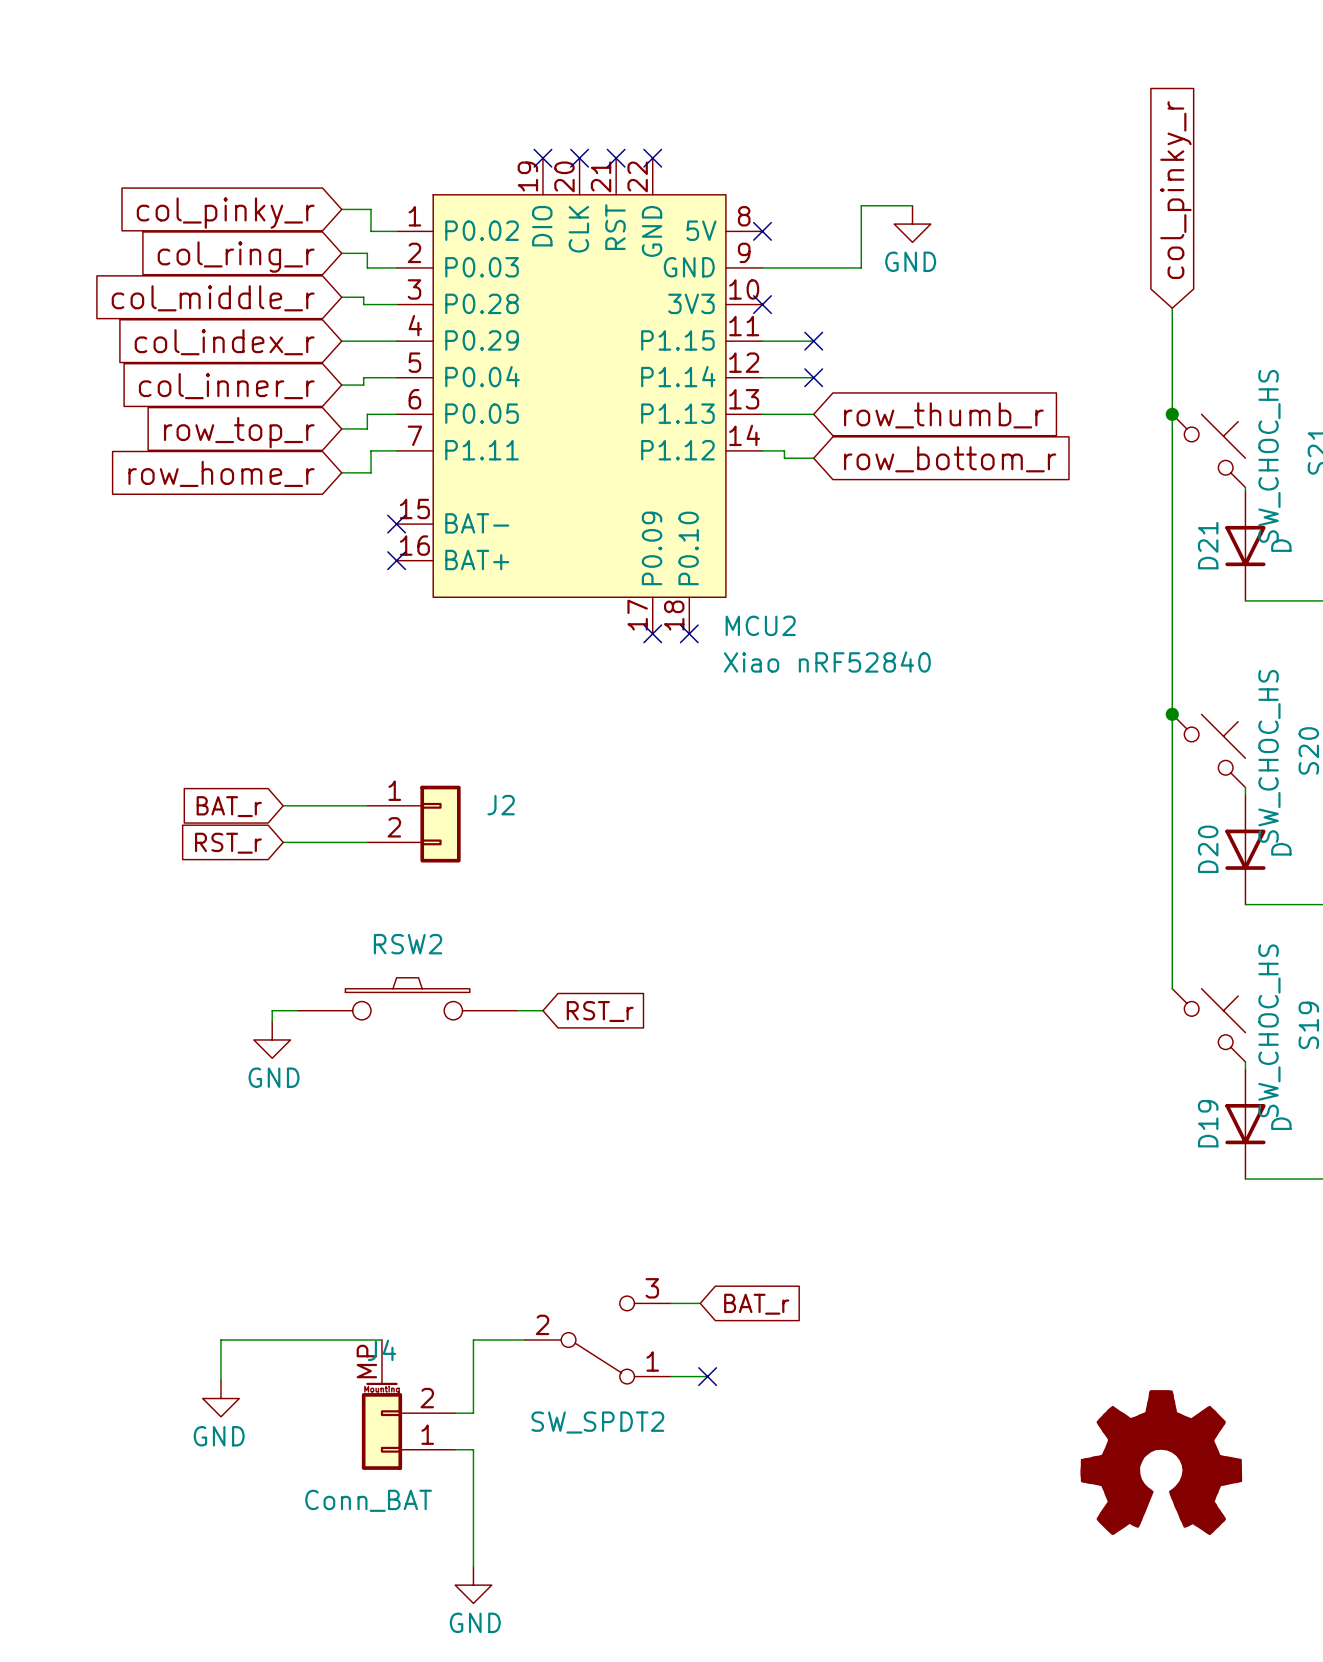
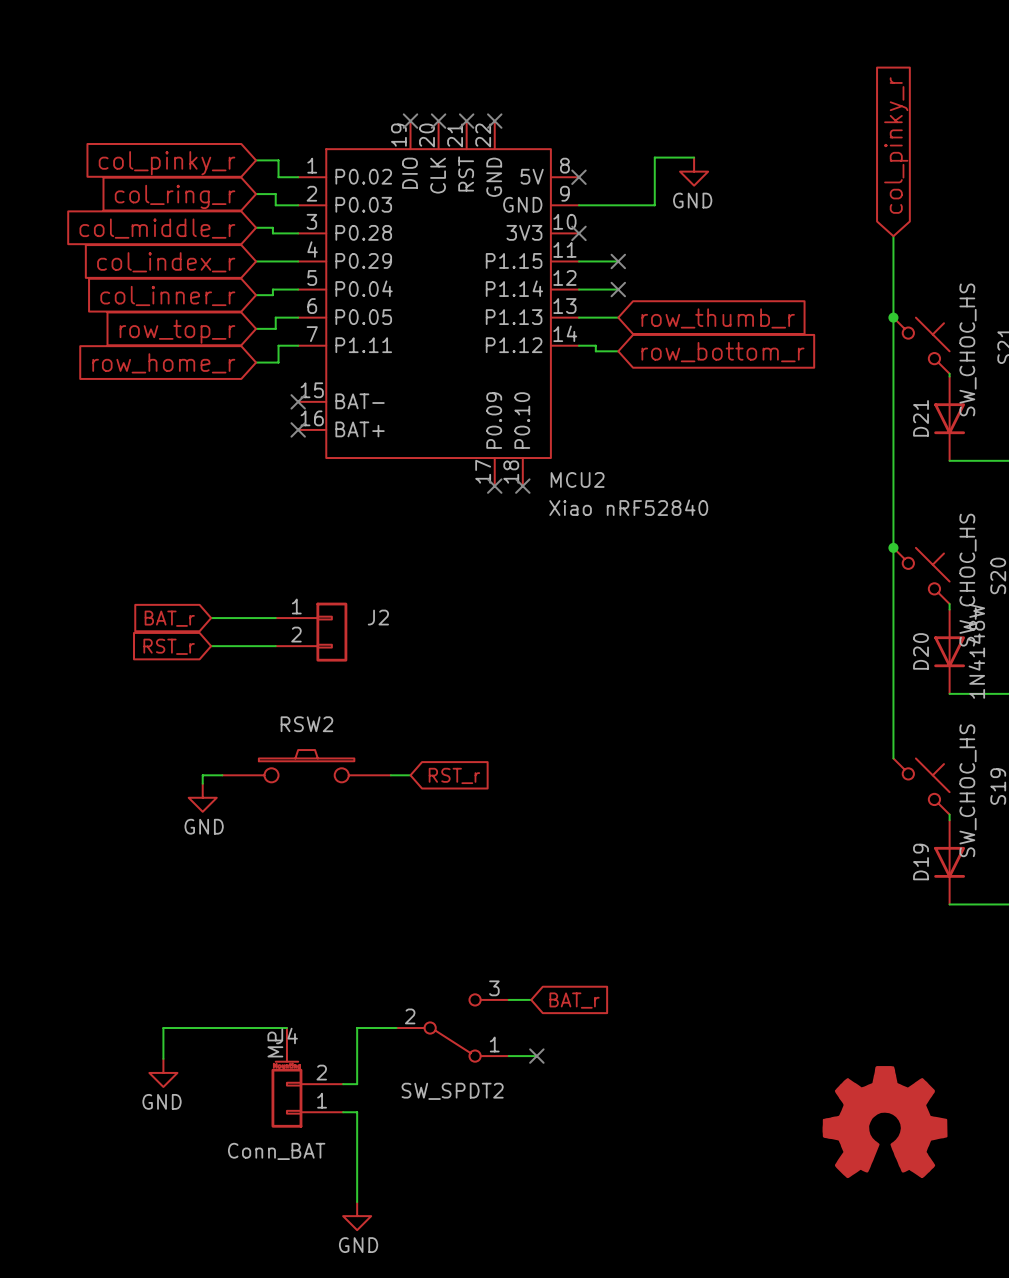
D21 value: D (1281, 545) -> none
D20 value: D (1281, 849) -> 1N4148W (976, 651)
D19 value: D (1281, 1123) -> none

